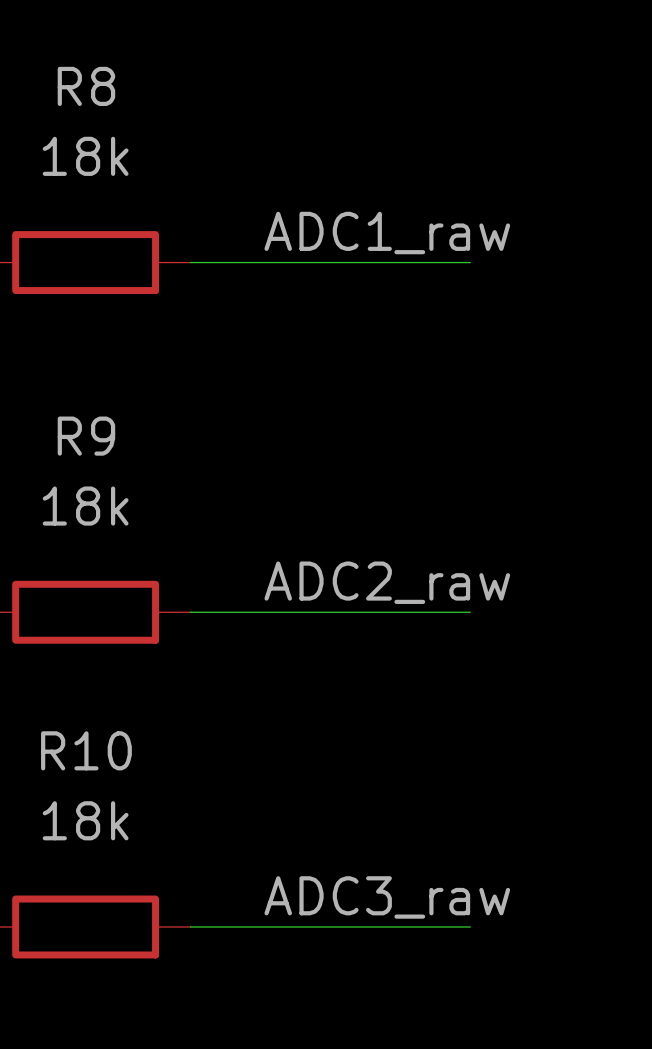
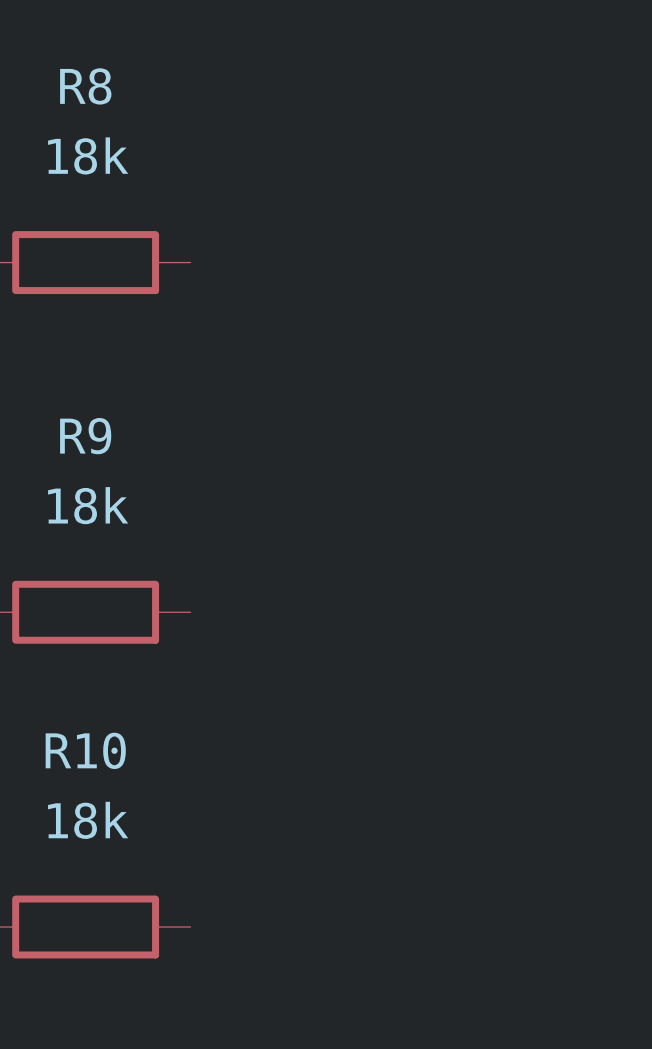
label: ADC1_raw (387, 233) -> none
wire: (190, 262) (470, 262) -> none
label: ADC2_raw (387, 582) -> none
wire: (190, 612) (470, 612) -> none
label: ADC3_raw (387, 897) -> none
wire: (190, 926) (470, 926) -> none

